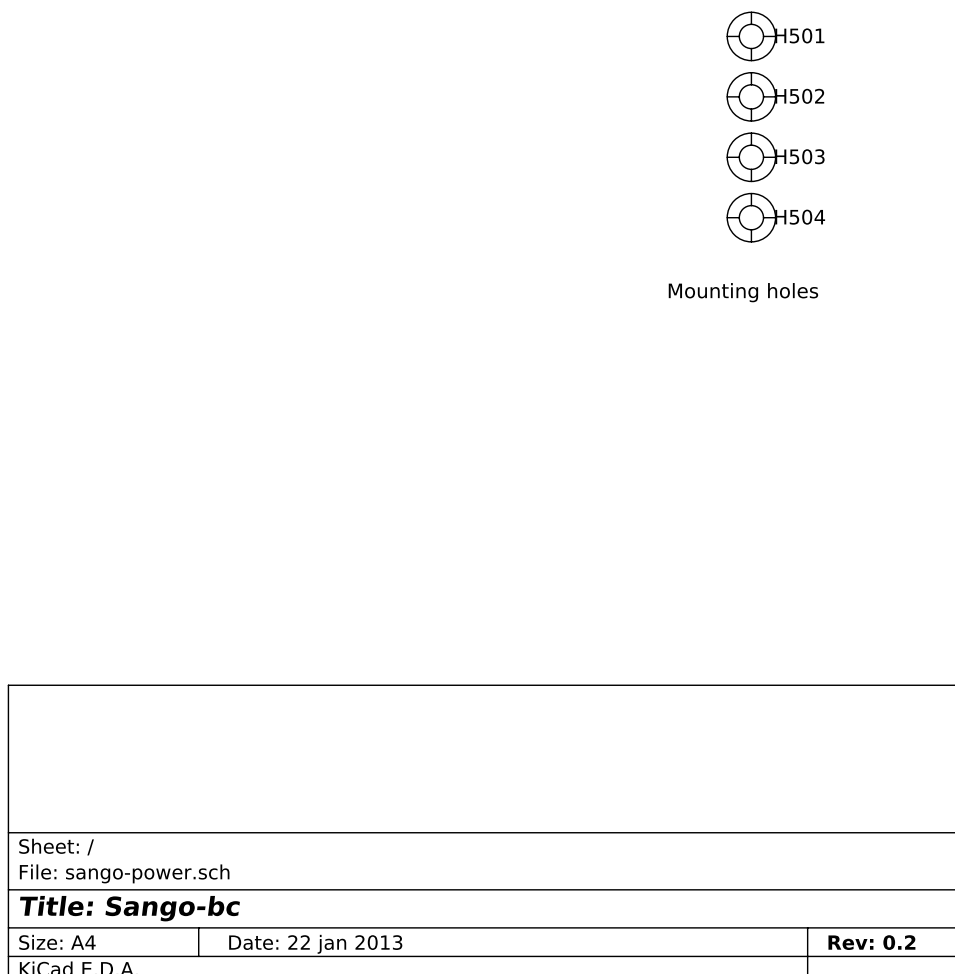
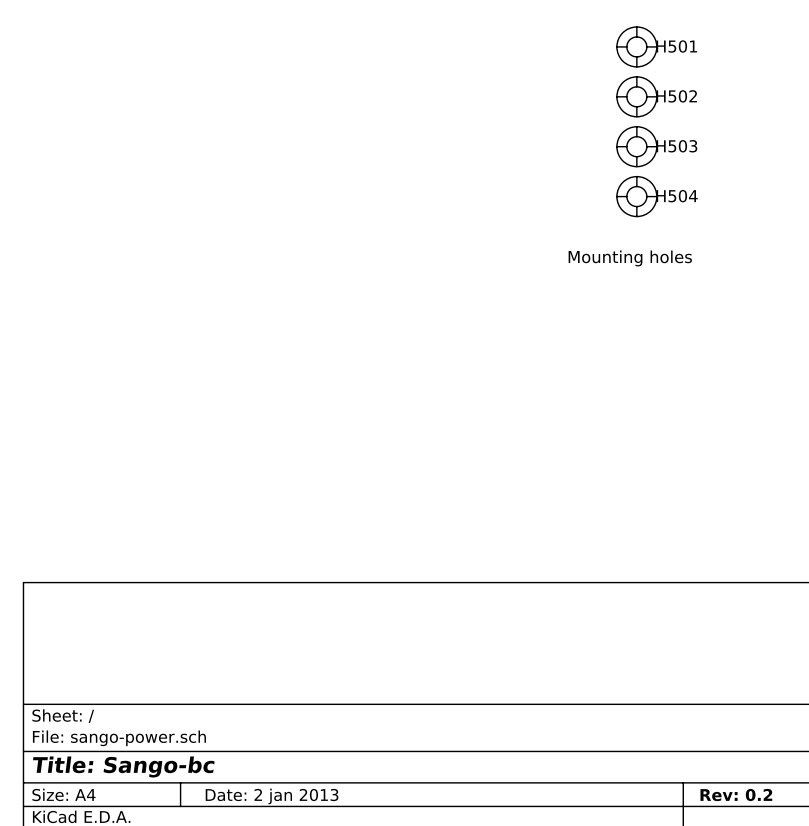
title block: Date: 22 jan 2013 (315, 944) -> Date: 2 jan 2013 (272, 796)

